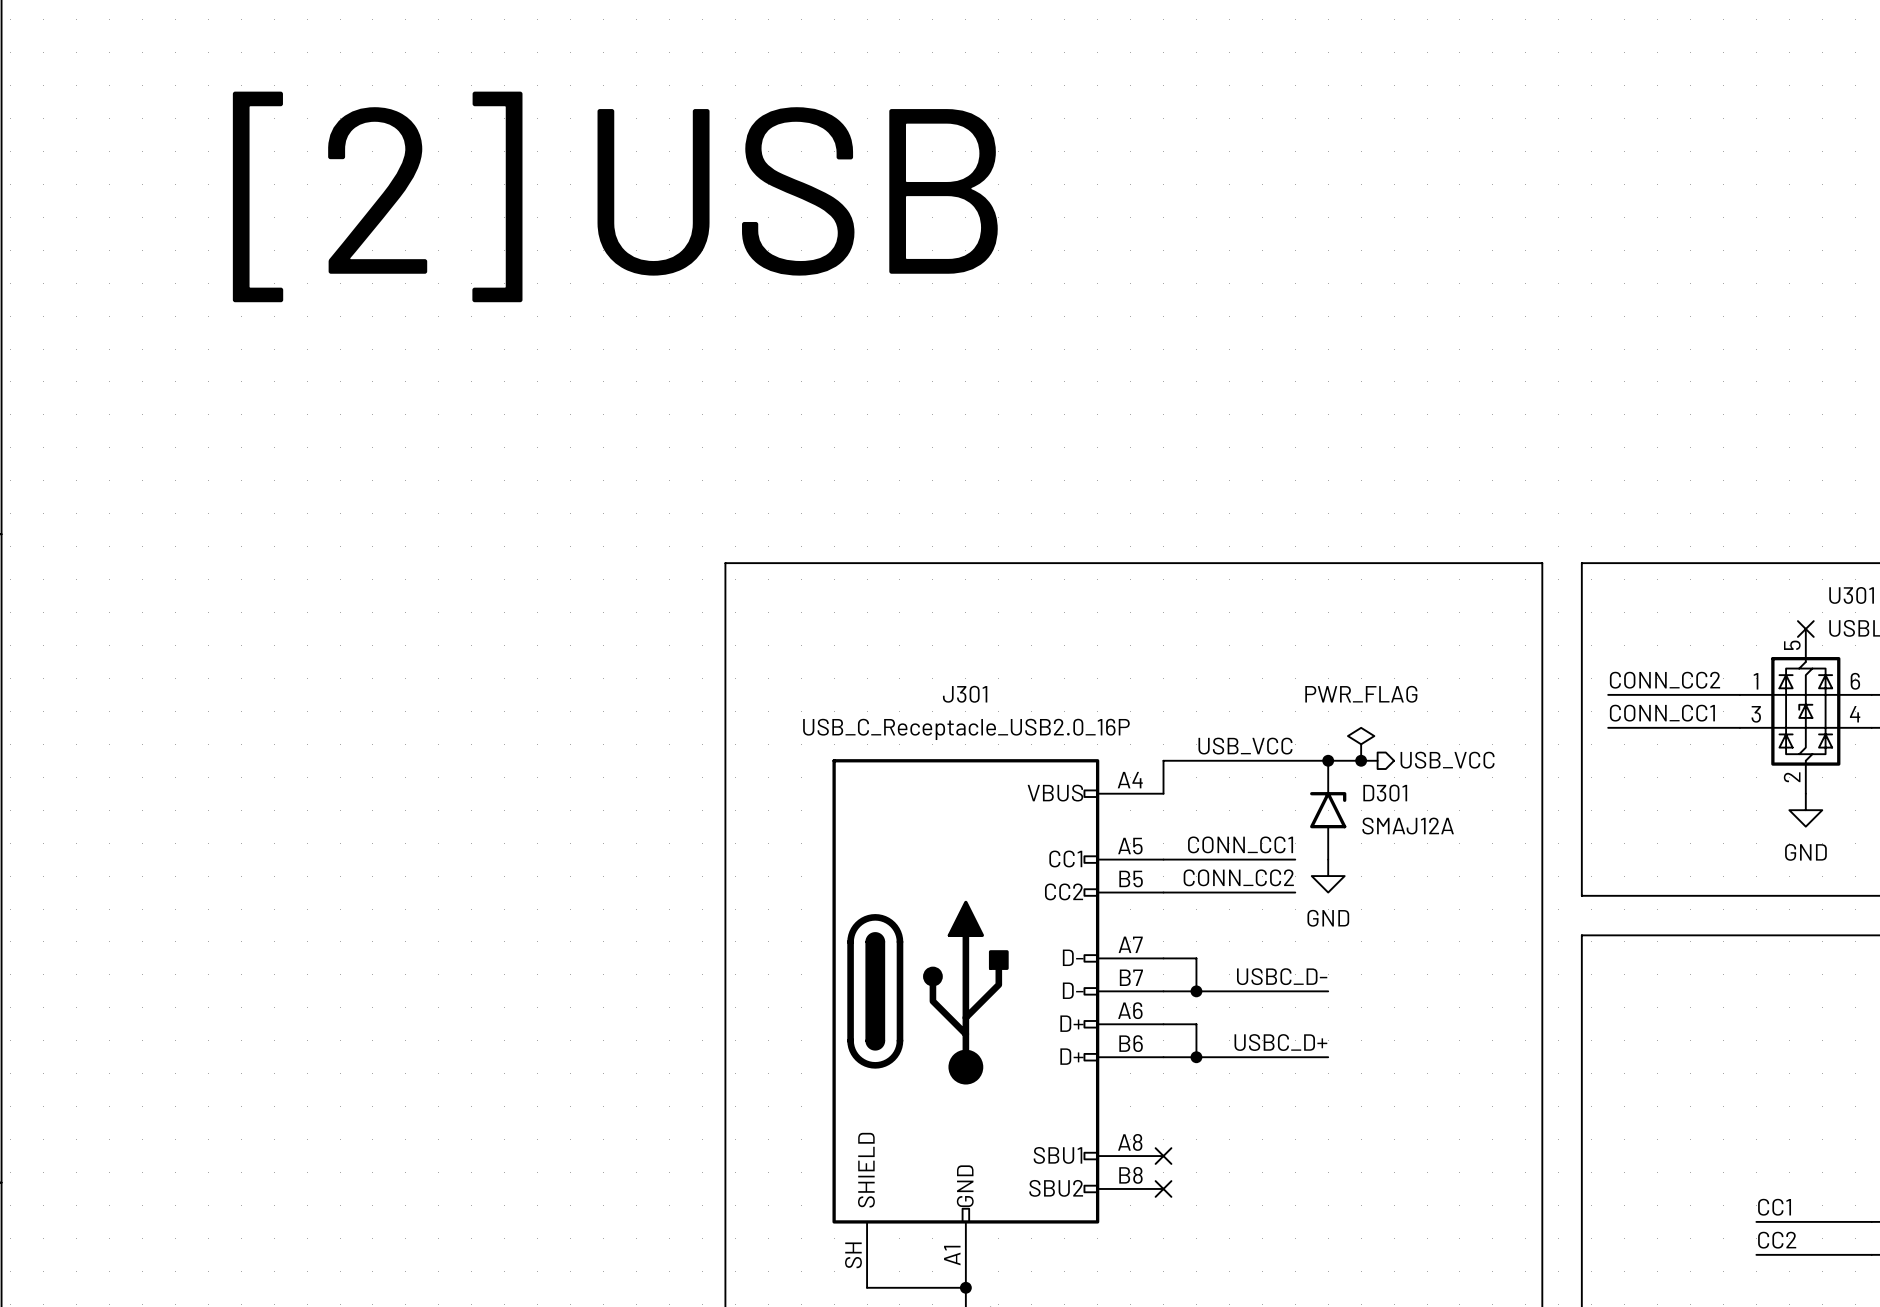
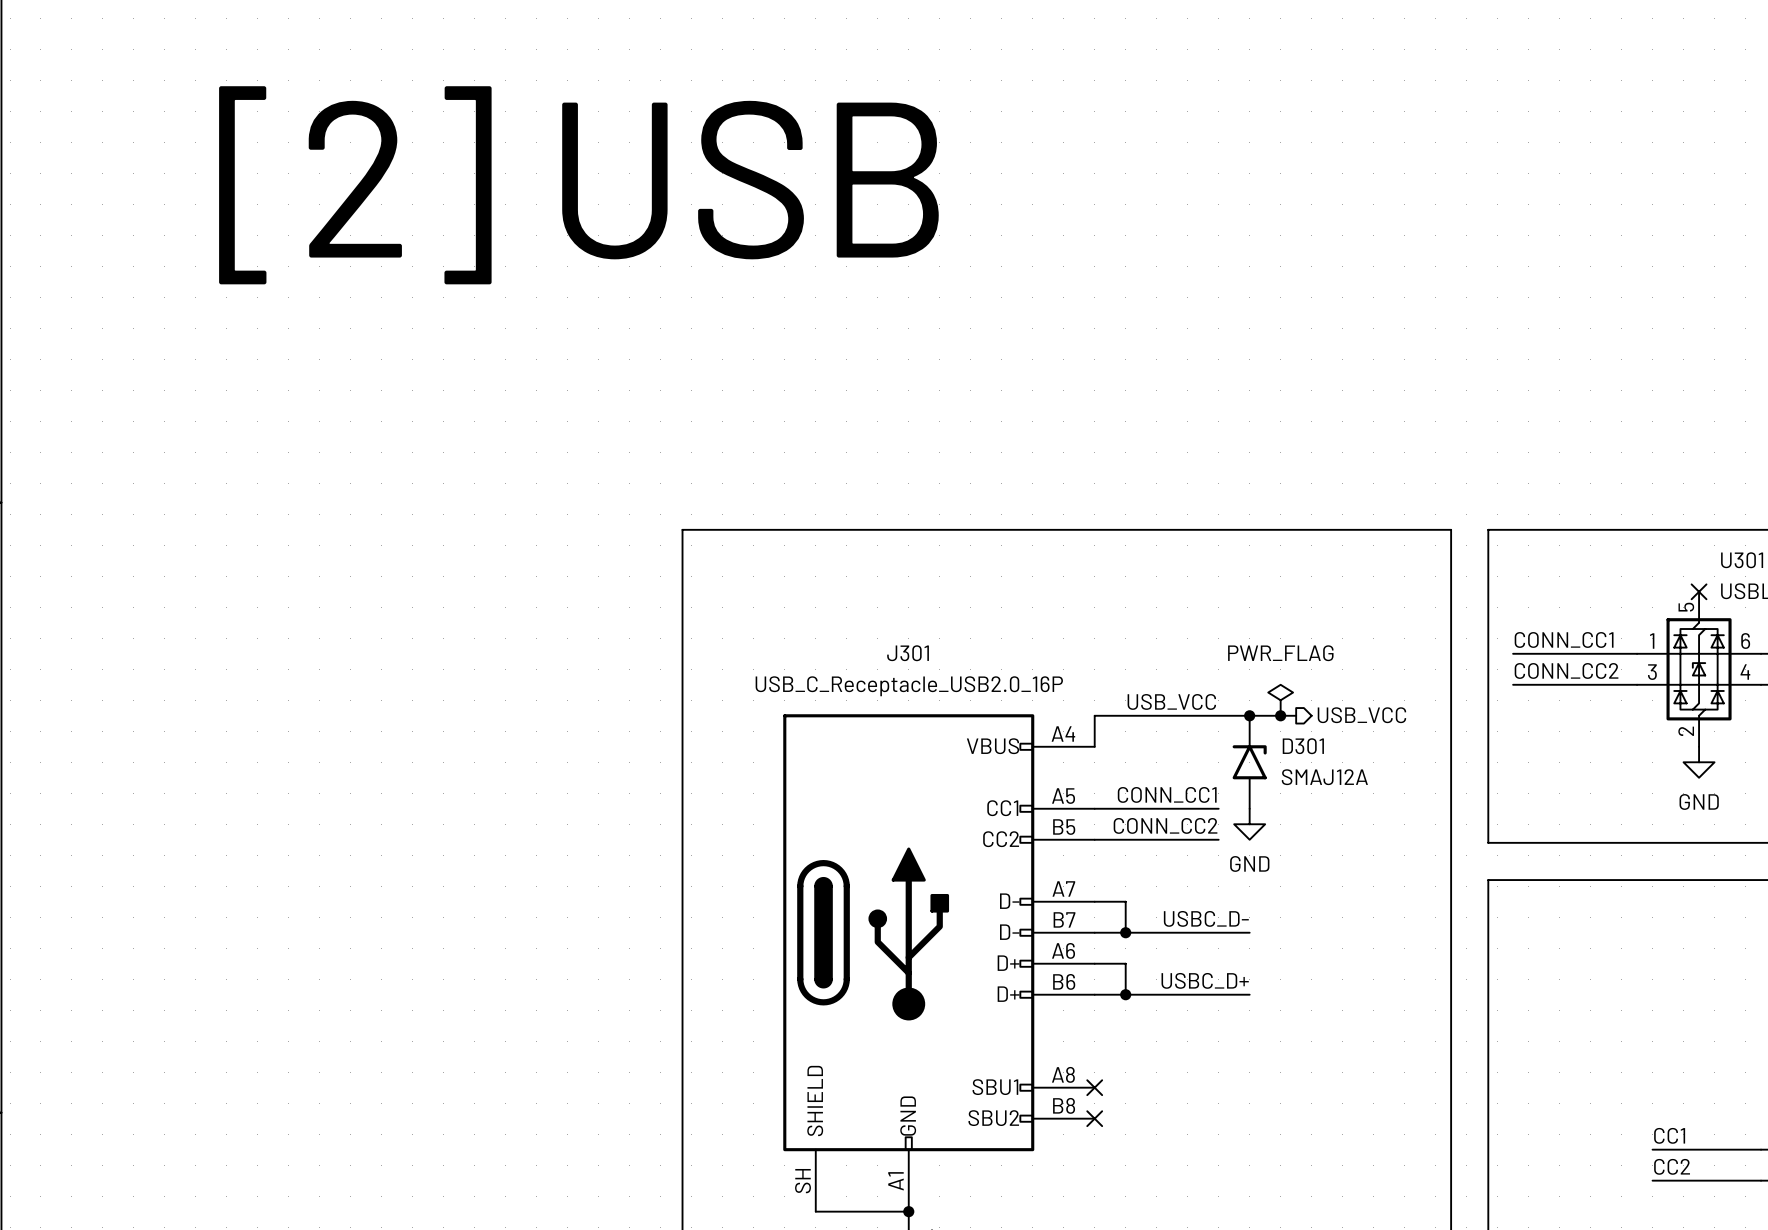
label: CONN_CC2 (1665, 680) -> CONN_CC1 (1564, 639)
label: CONN_CC1 (1662, 713) -> CONN_CC2 (1566, 670)

